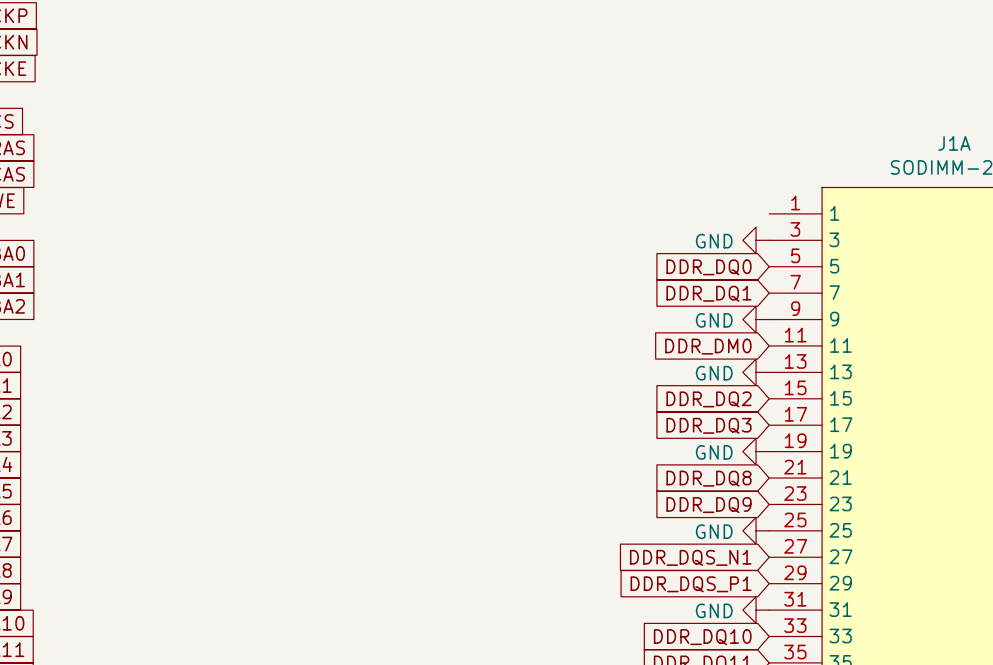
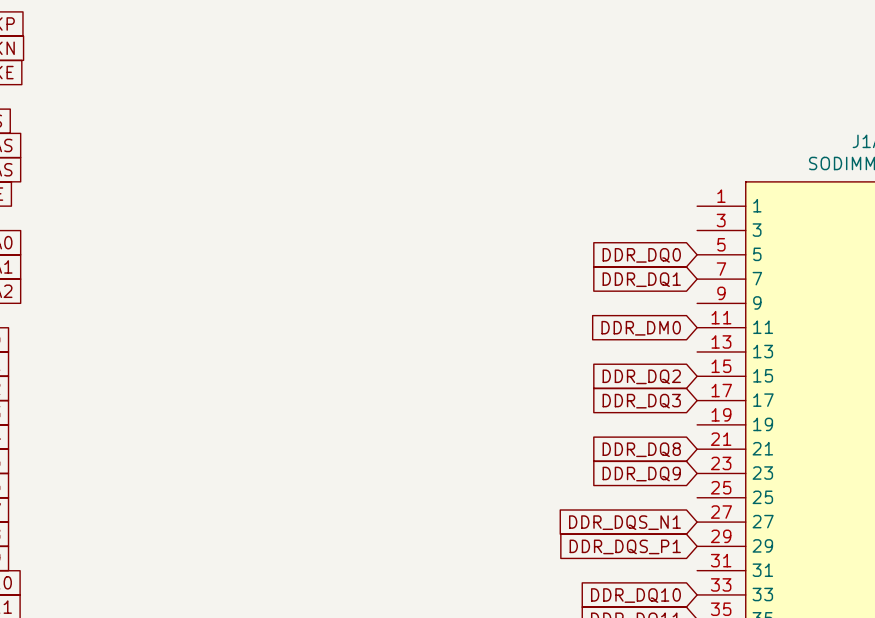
power symbol: GND (756, 240) -> none
power symbol: GND (756, 319) -> none
power symbol: GND (756, 372) -> none
power symbol: GND (756, 451) -> none
power symbol: GND (756, 530) -> none
power symbol: GND (756, 610) -> none

